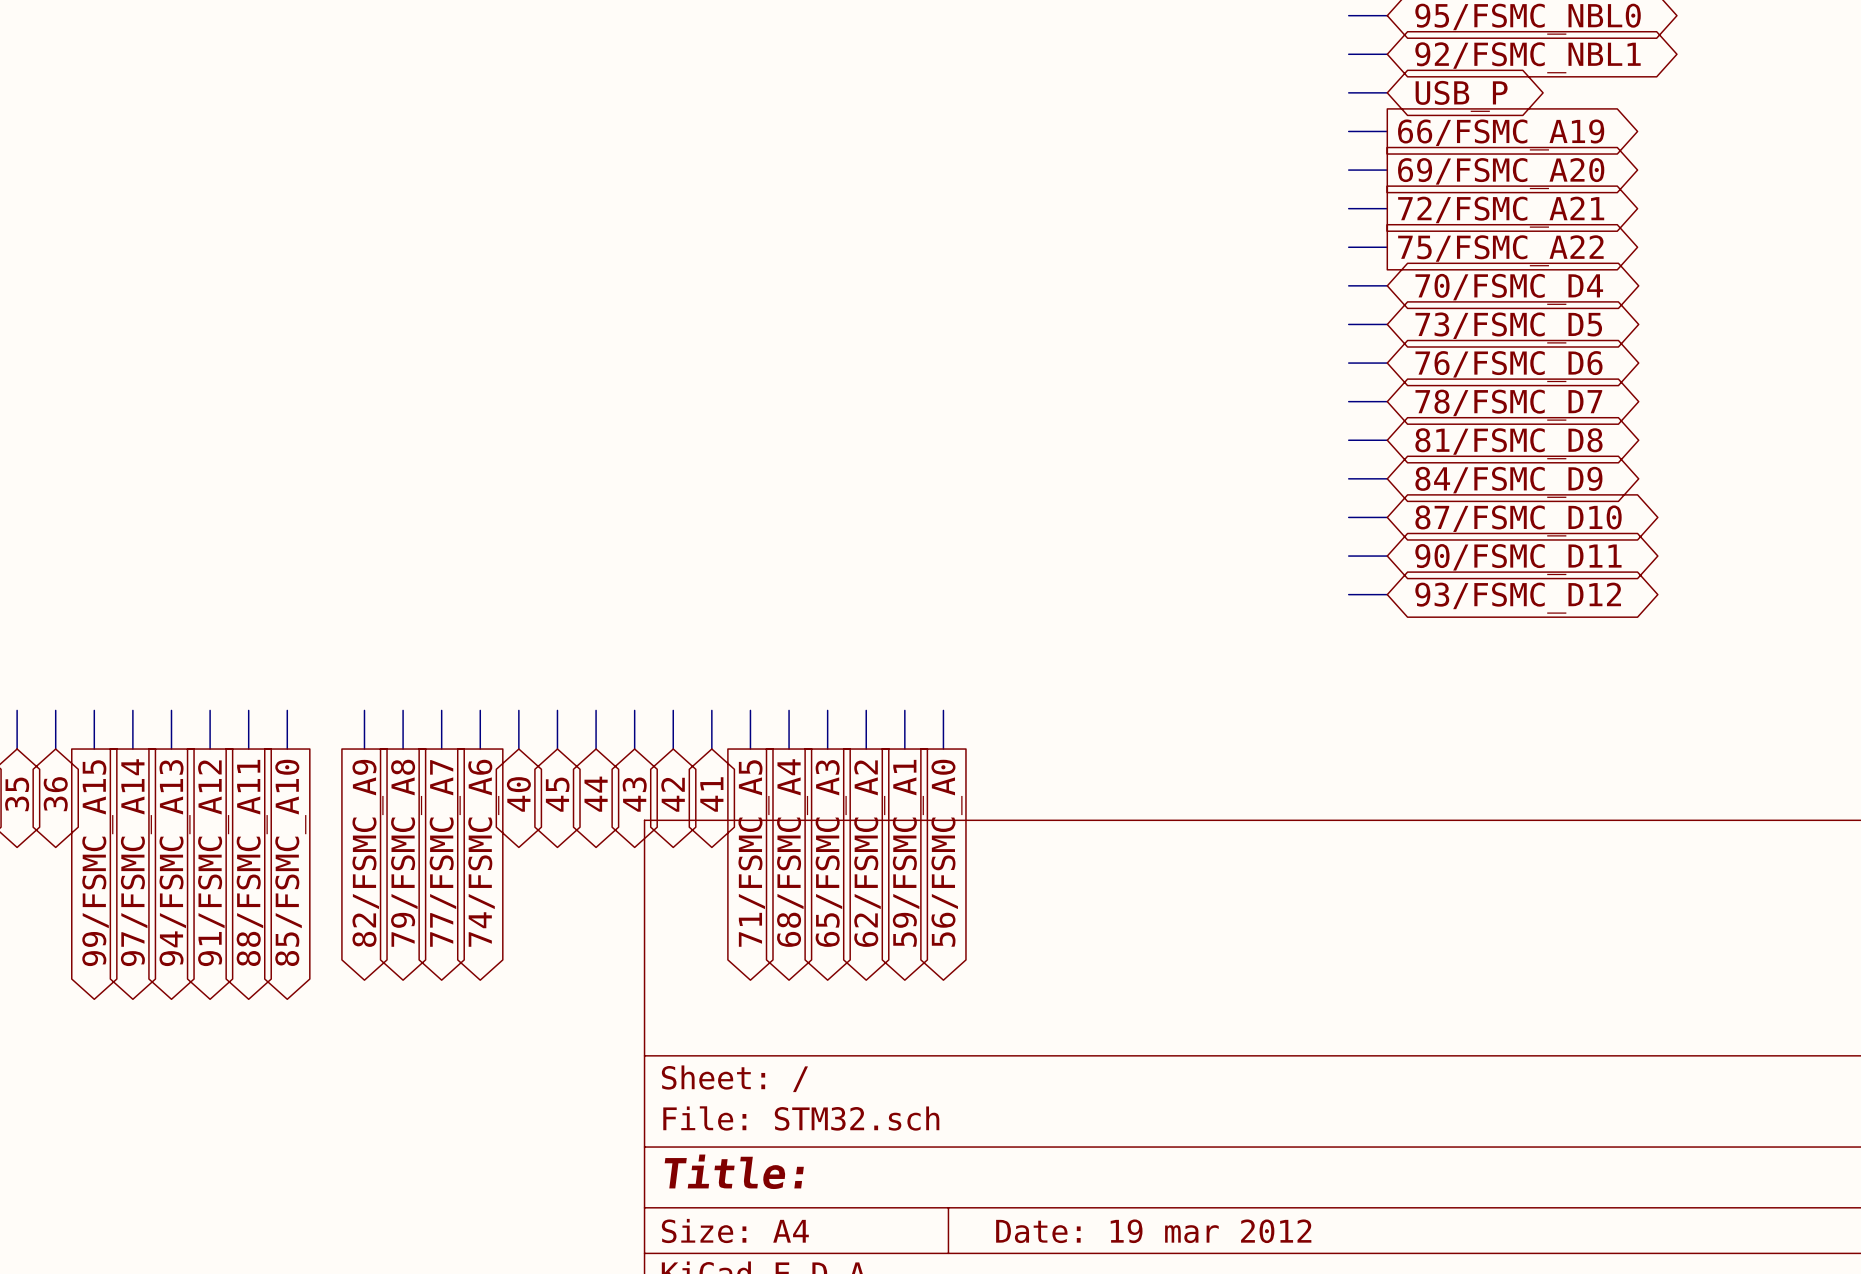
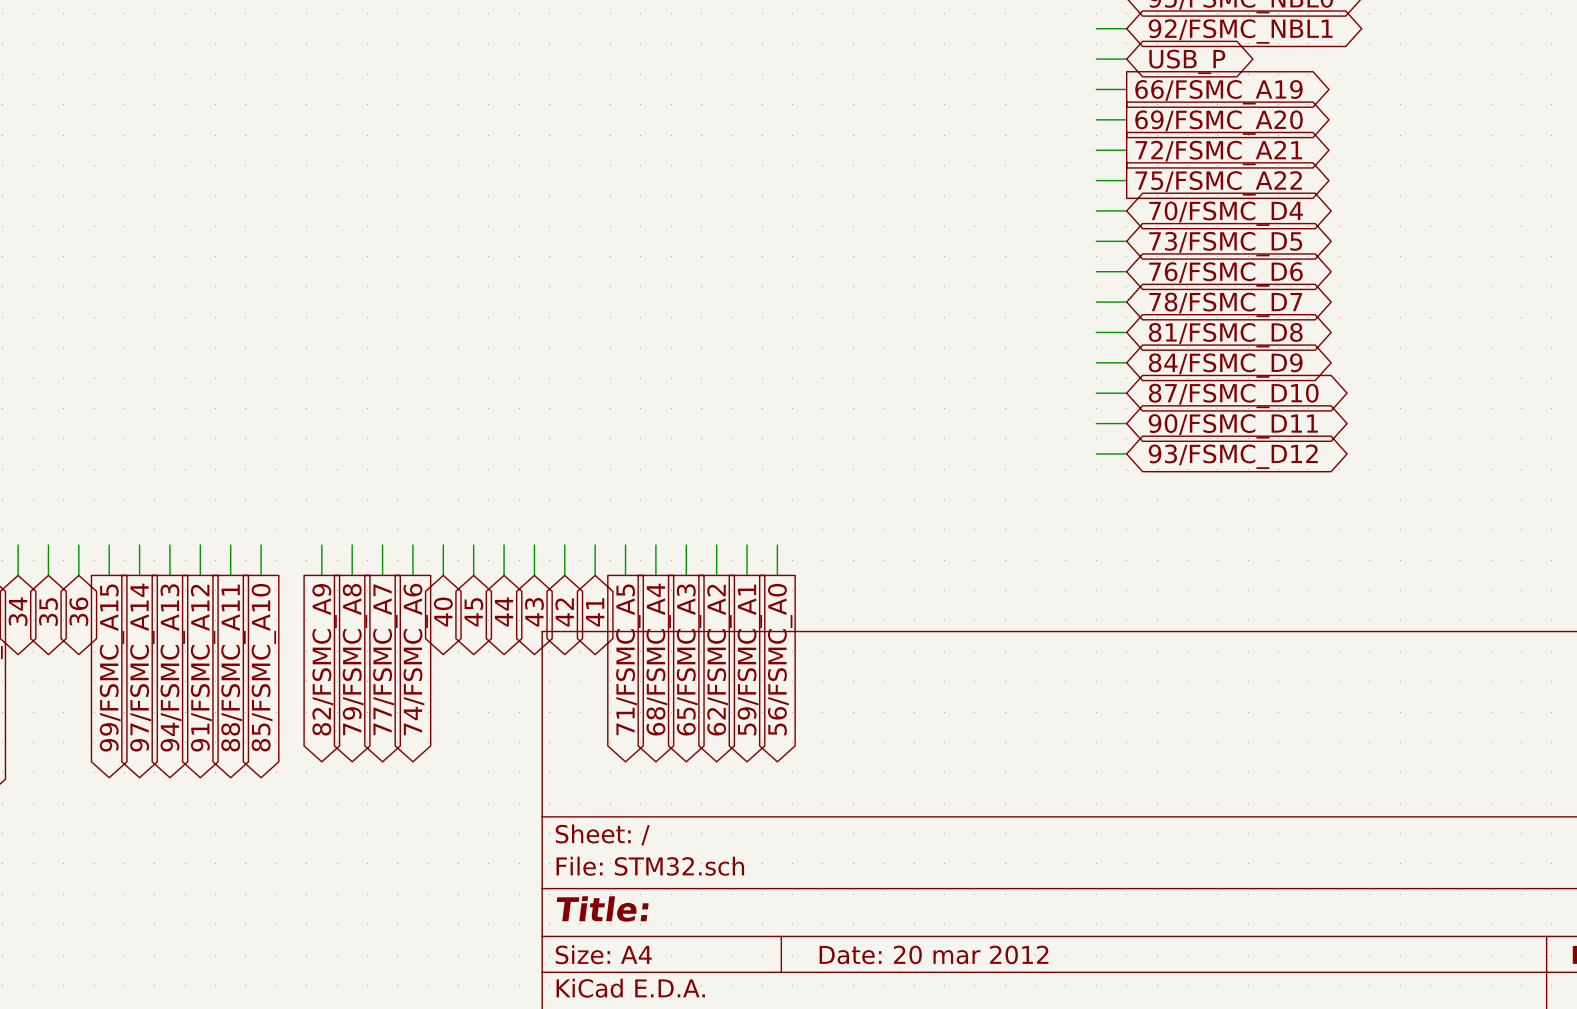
title block: Date: 19 mar 2012 (1153, 1231) -> Date: 20 mar 2012 (934, 954)

